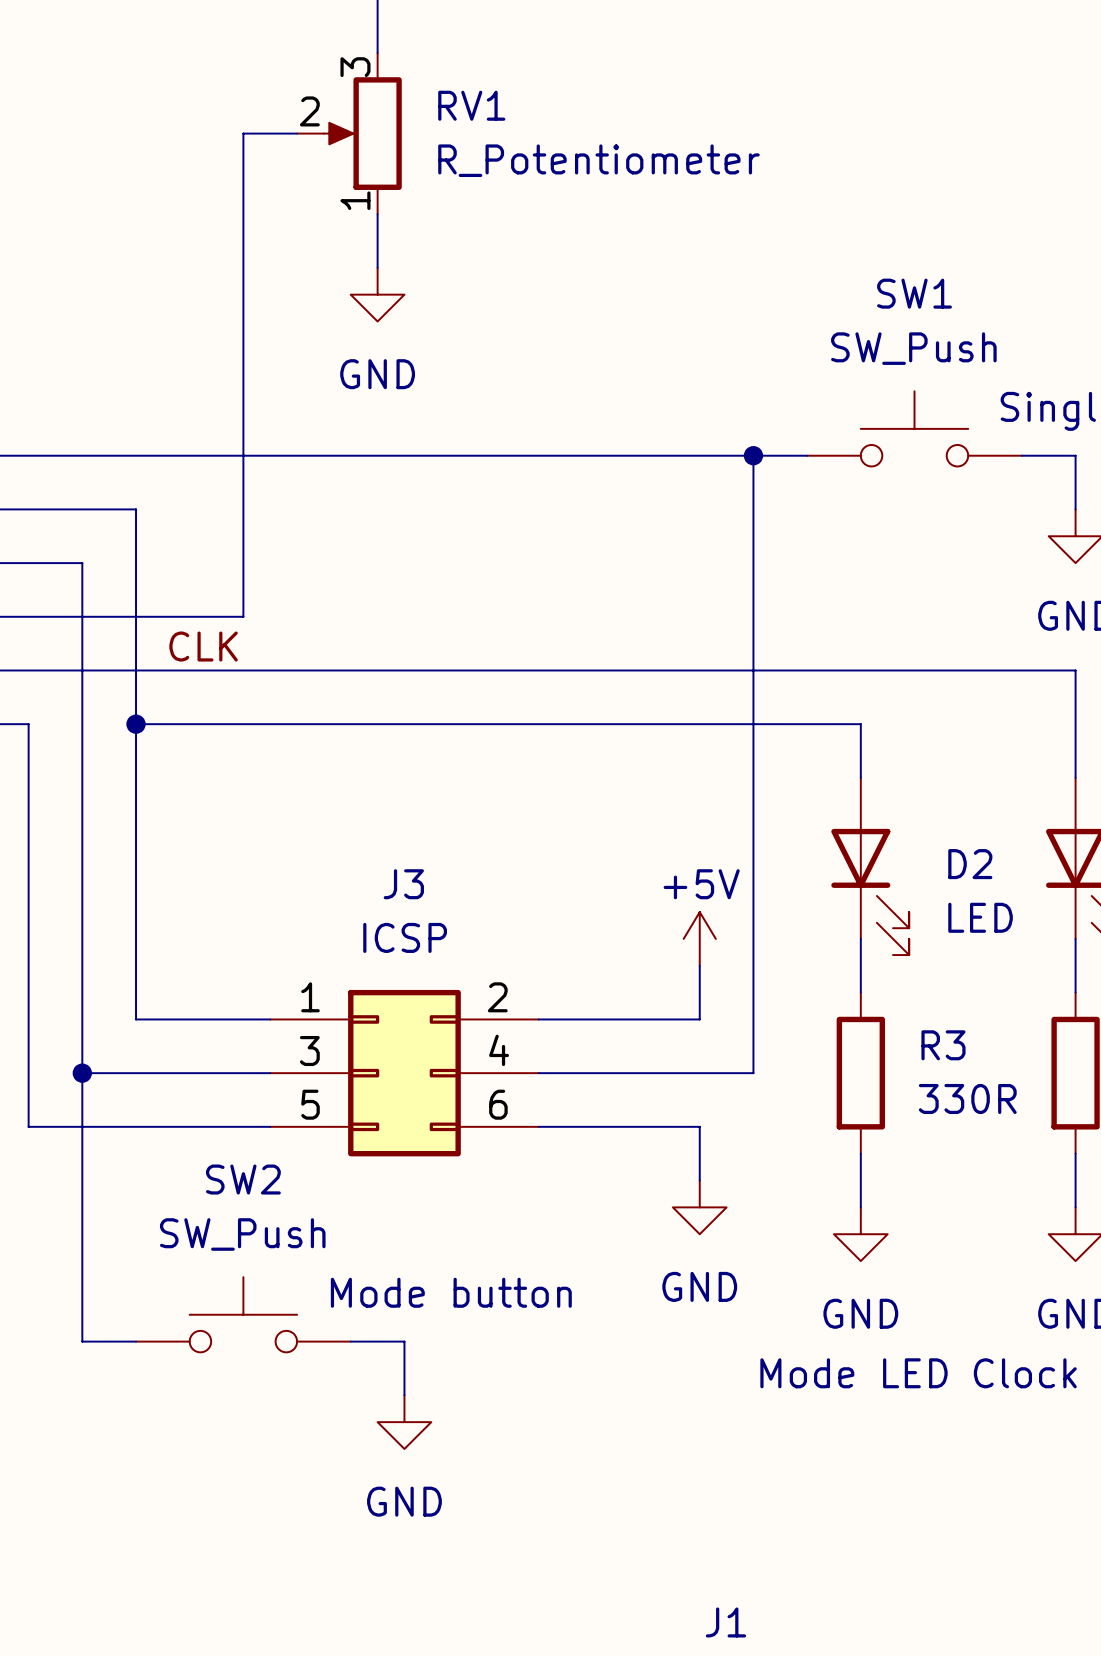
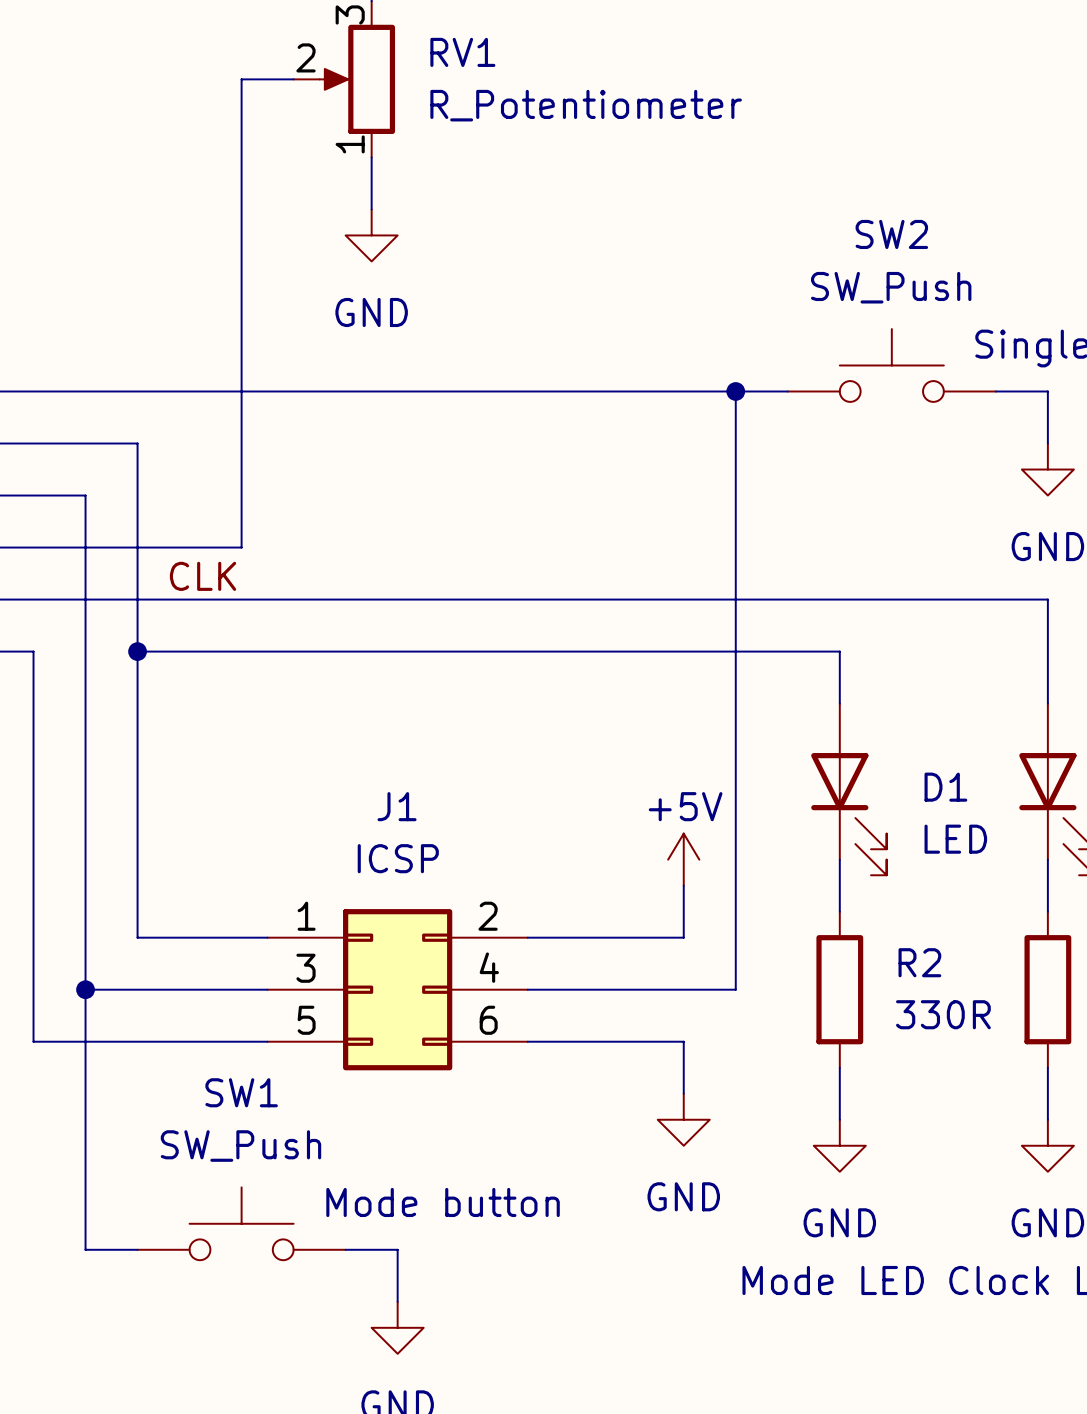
SW1 name: SW1 (914, 293) -> SW2 (891, 234)
D2 name: D2 (970, 864) -> D1 (945, 787)
J3 name: J3 (403, 884) -> J1 (397, 806)
R3 name: R3 (943, 1045) -> R2 (919, 962)
SW2 name: SW2 (243, 1179) -> SW1 (241, 1092)

